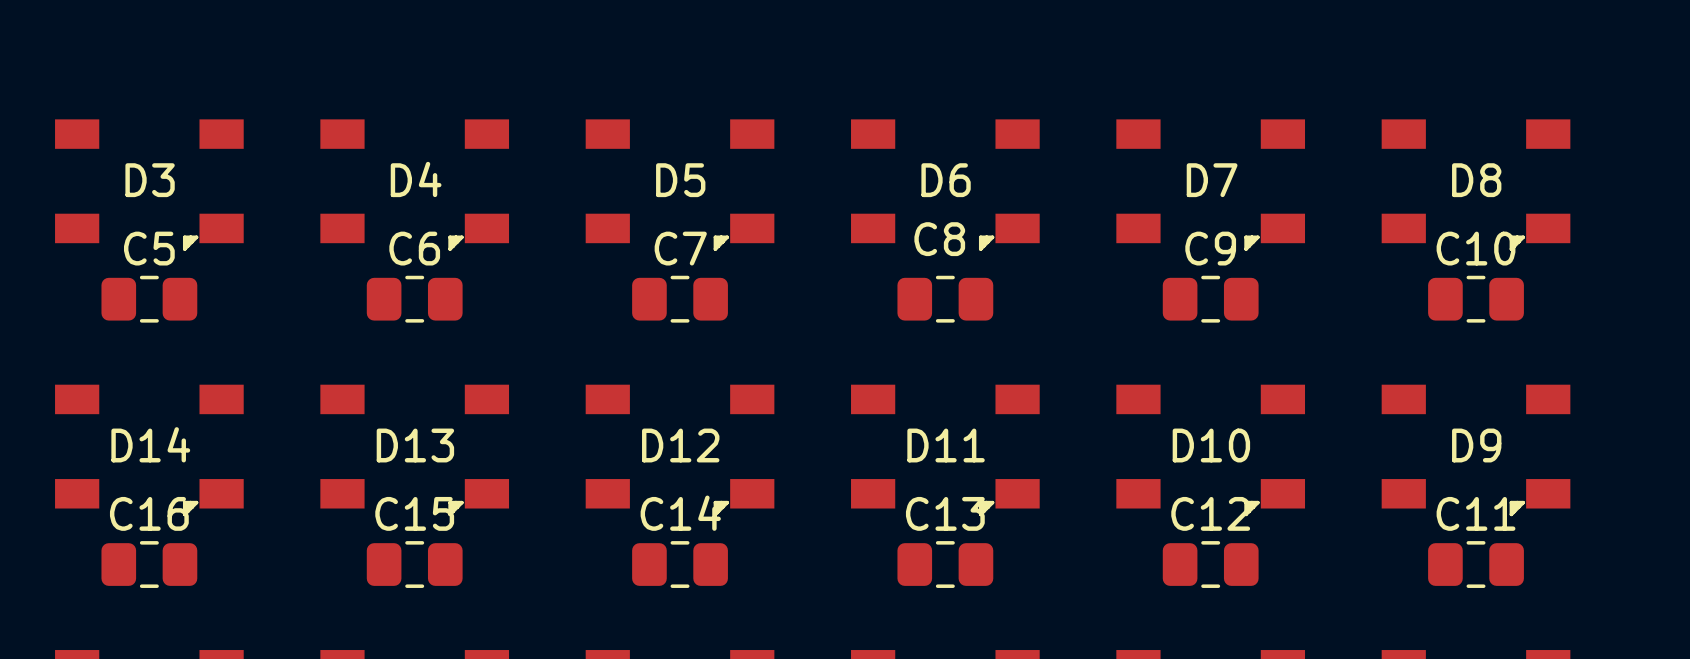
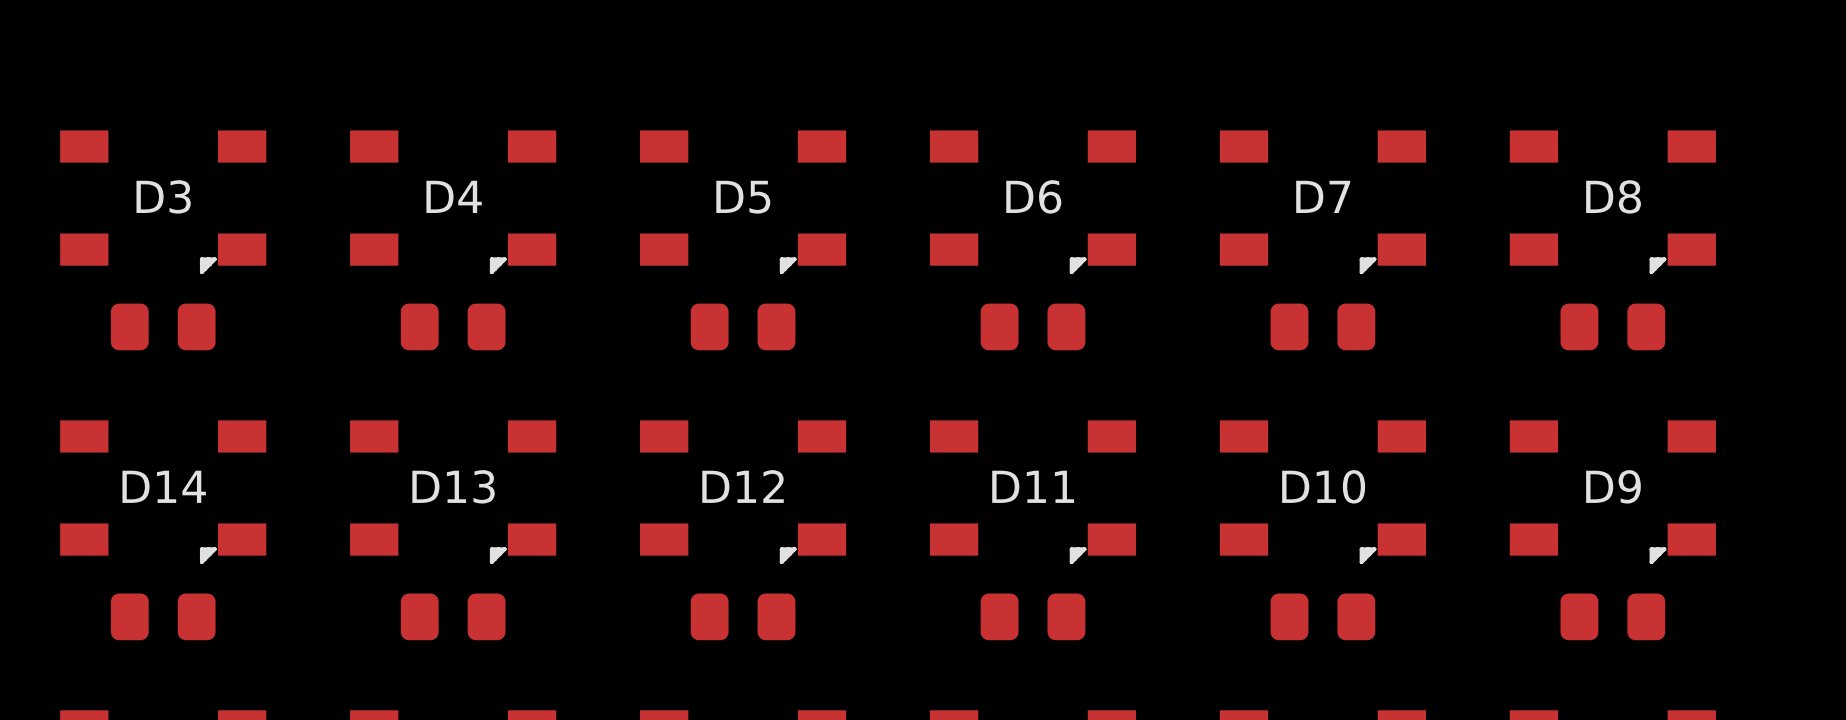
C5: (149, 299) -> none
C6: (414, 299) -> none
C7: (680, 299) -> none
C8: (945, 299) -> none
C9: (1210, 299) -> none
C10: (1476, 299) -> none
C16: (149, 564) -> none
C15: (414, 564) -> none
C14: (680, 564) -> none
C13: (945, 564) -> none
C12: (1210, 564) -> none
C11: (1476, 564) -> none

